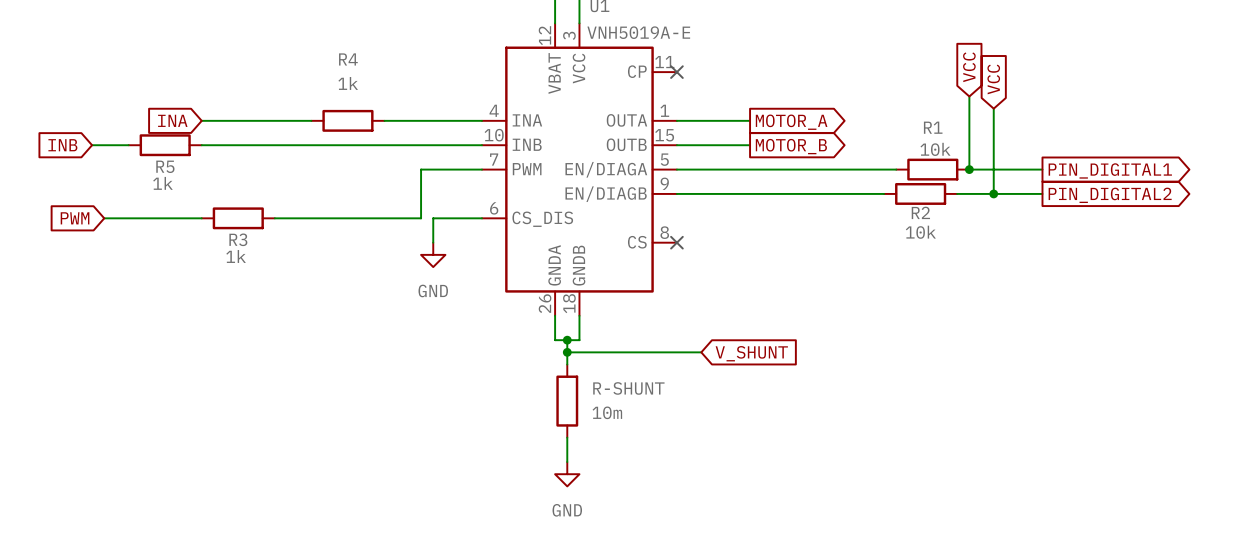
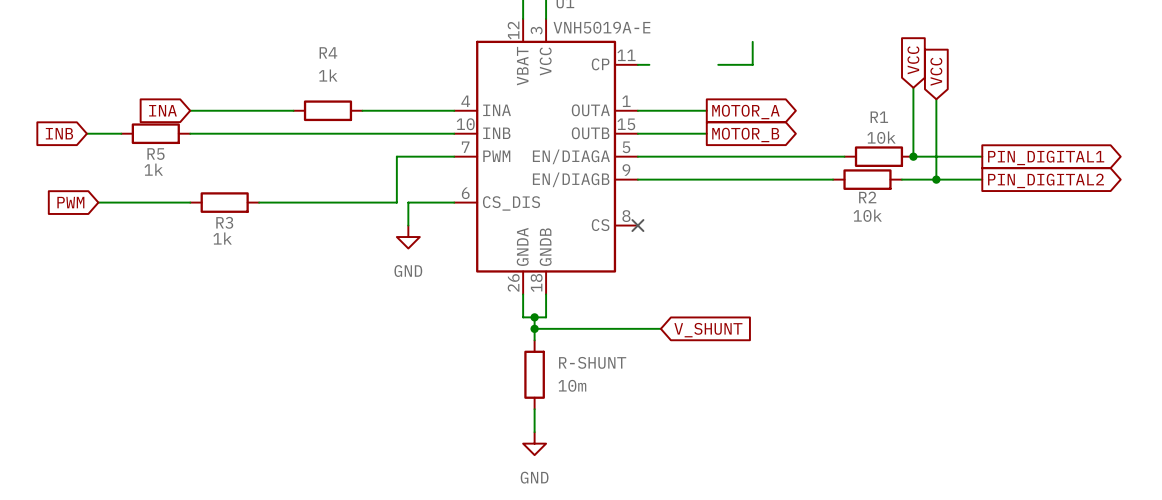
wire: none -> (752, 41) (752, 64) (718, 64)
wire: none -> (637, 64) (649, 64)
no-connect mark: (676, 72) -> none

